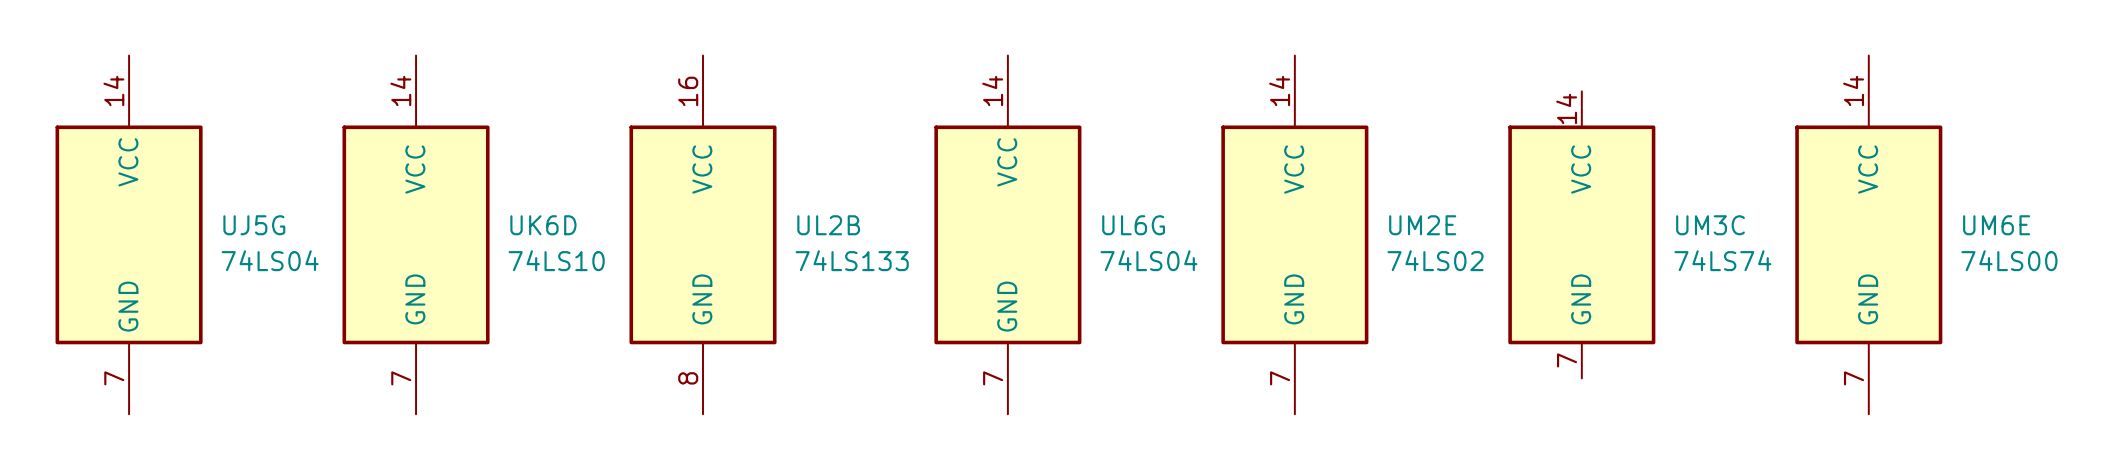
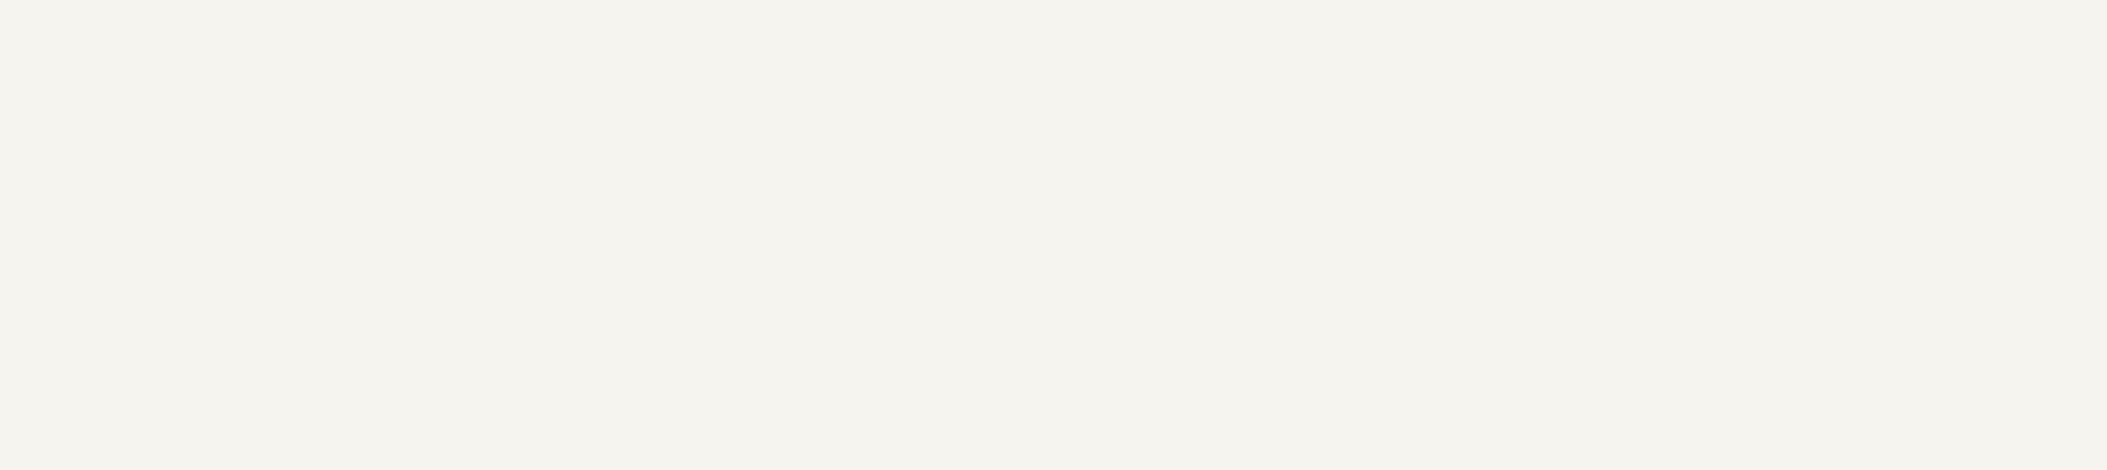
UJ5G: 74LS04 (129, 234) -> none
UK6D: 74LS10 (416, 234) -> none
UL2B: 74LS133 (703, 234) -> none
UL6G: 74LS04 (1007, 234) -> none
UM2E: 74LS02 (1294, 234) -> none
UM3C: 74LS74 (1581, 234) -> none
UM6E: 74LS00 (1868, 234) -> none

